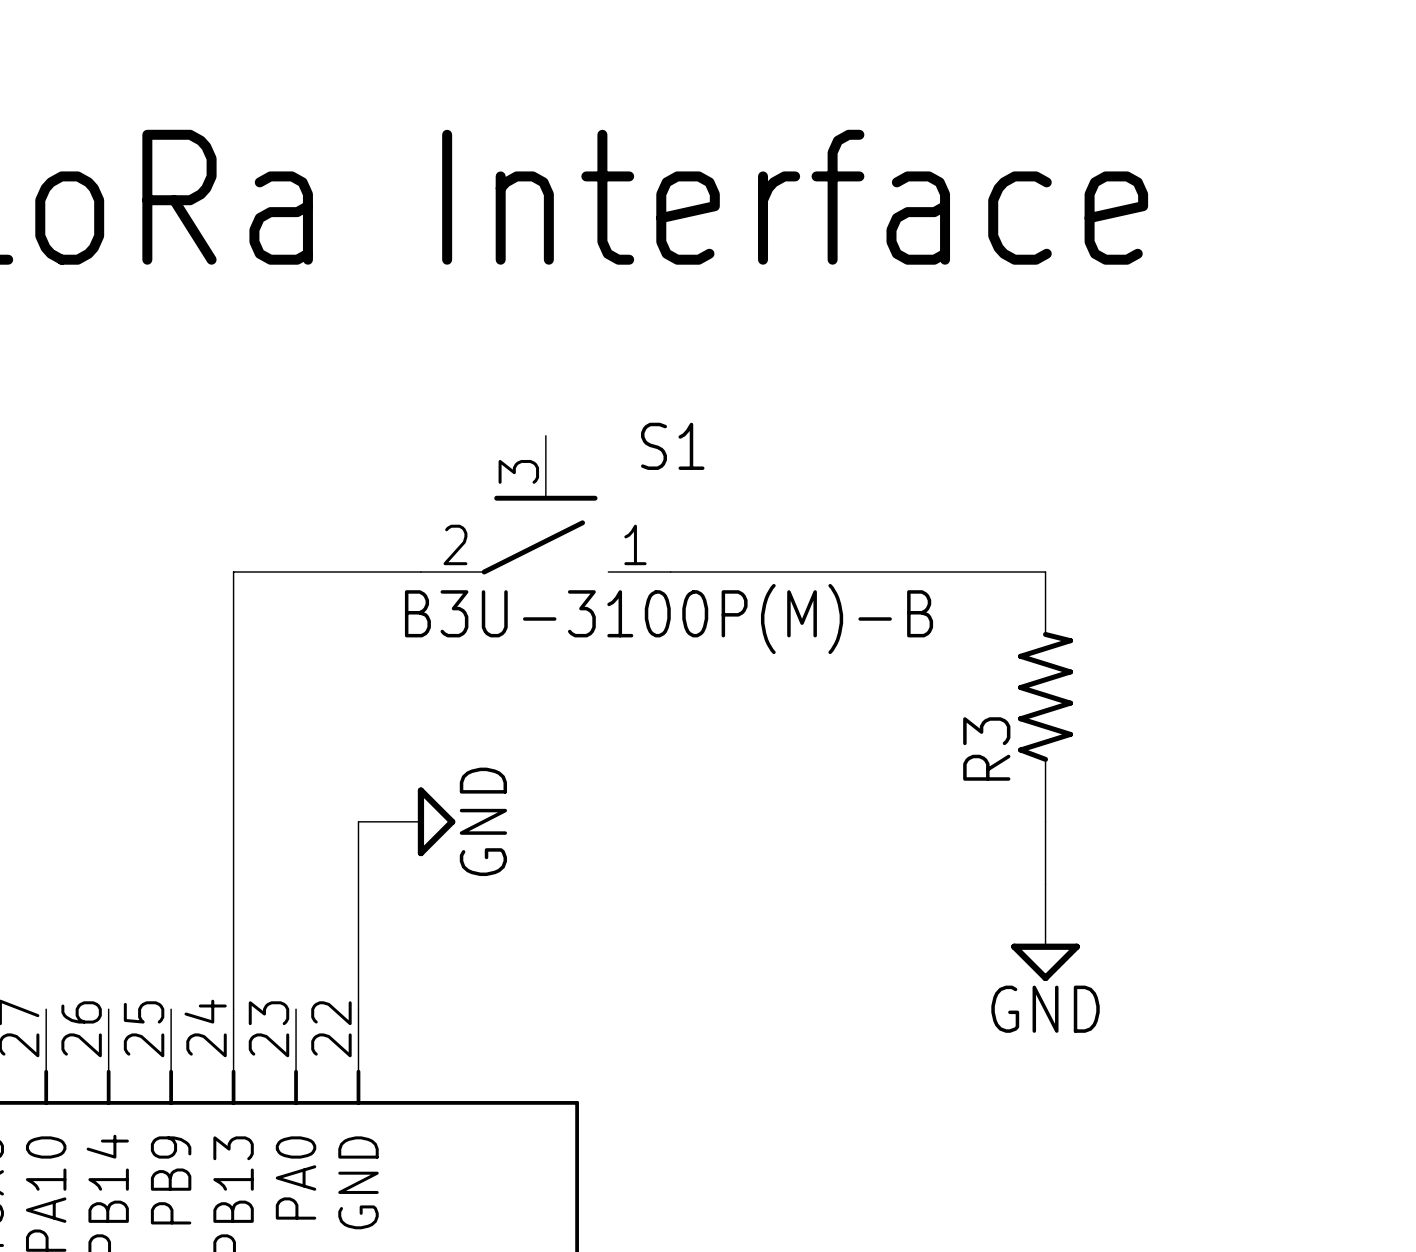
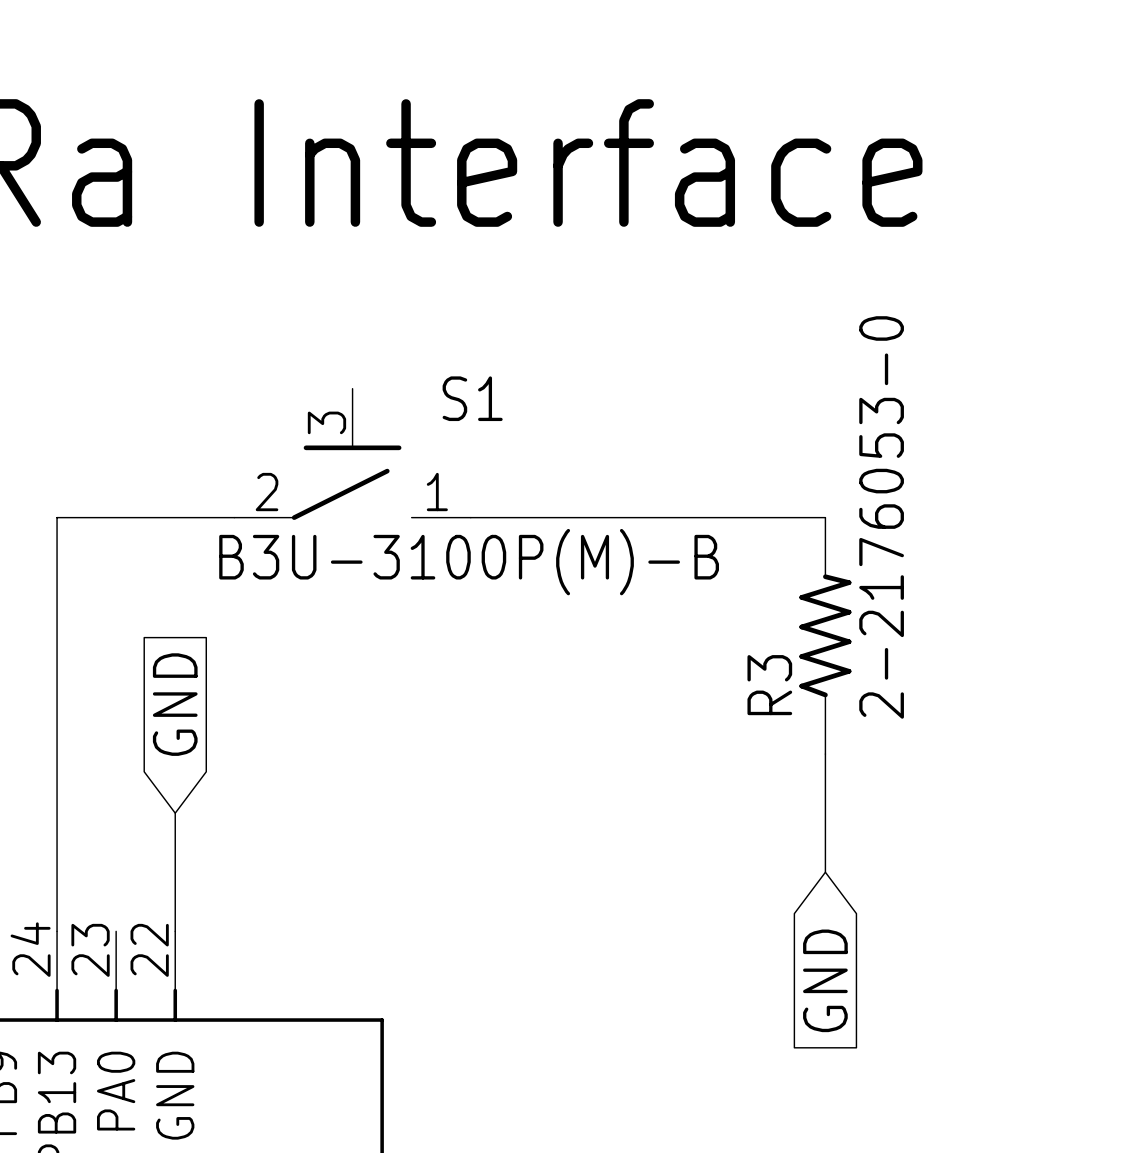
R3 value: none -> 2-2176053-0 (881, 517)
global label: none -> GND (175, 704)
wire: (358, 821) (358, 884) -> none
power symbol: GND (406, 821) -> none
power symbol: GND (1045, 932) -> none
global label: none -> GND (825, 980)

